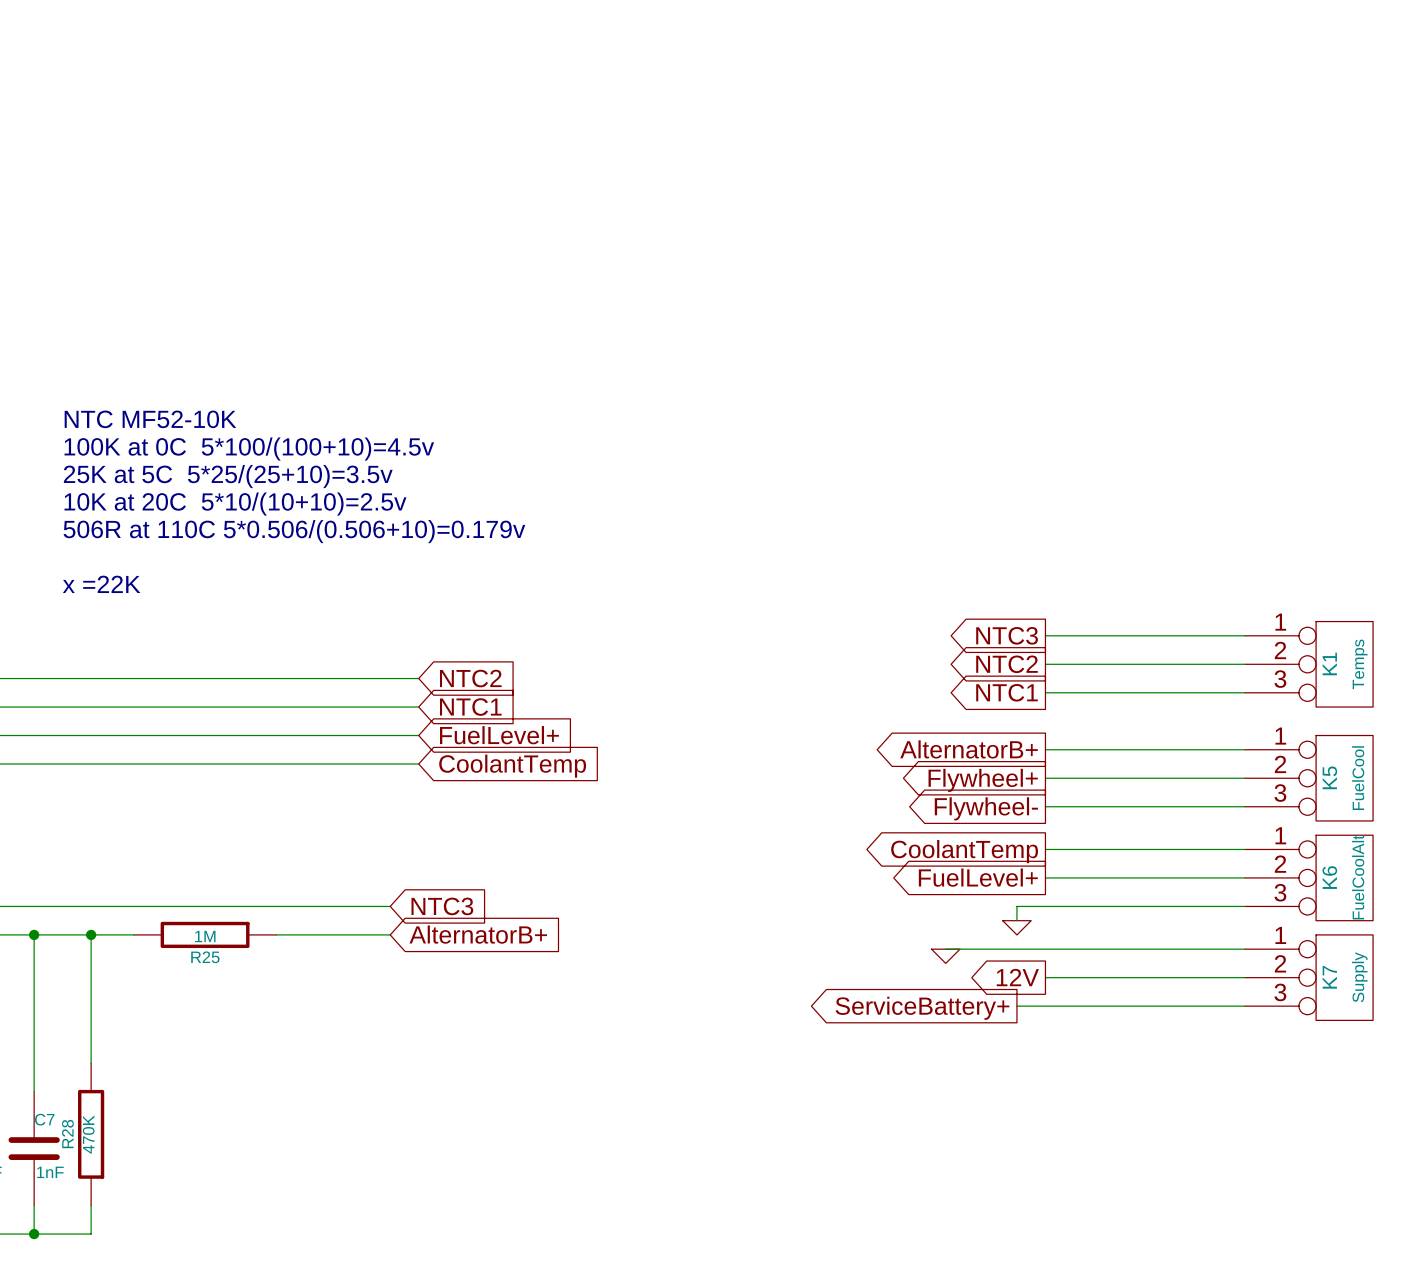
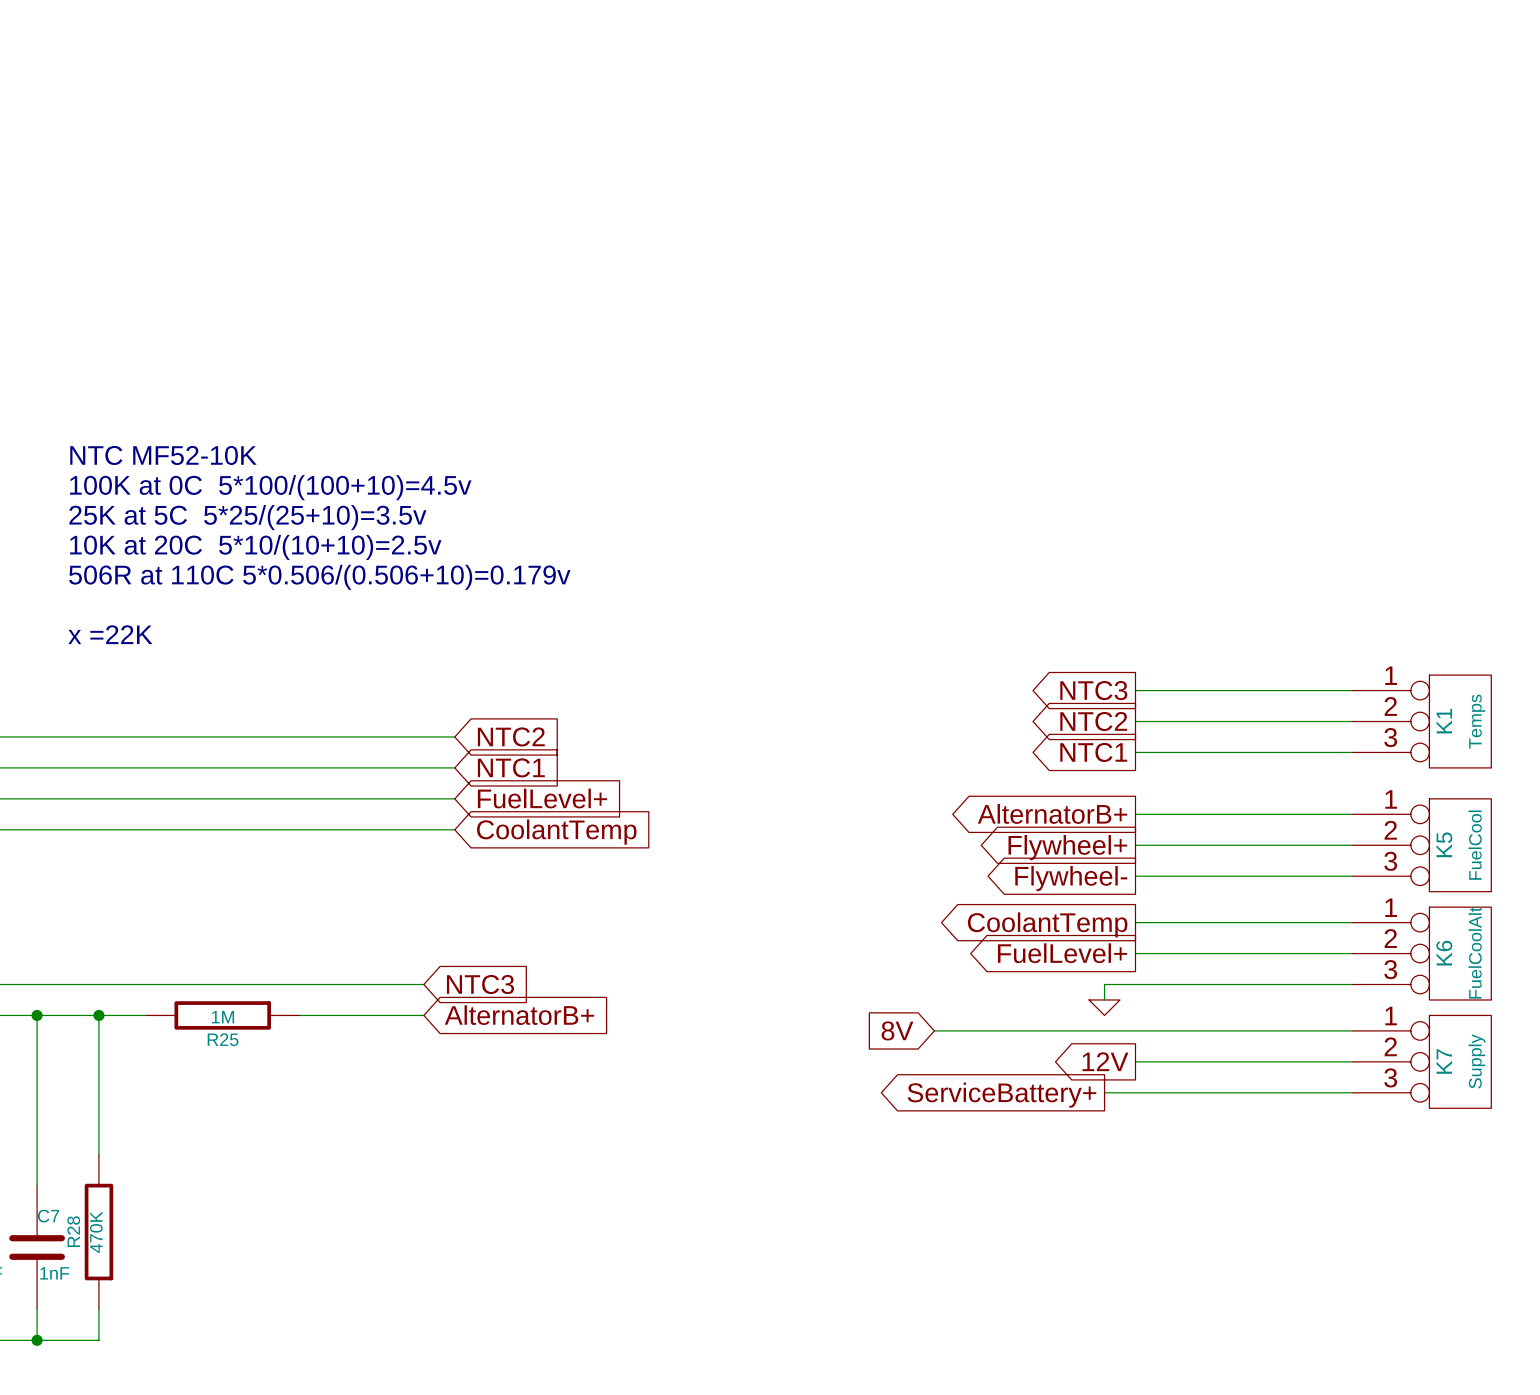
global label: none -> 8V (897, 1030)
wire: none -> (934, 1030) (1027, 1030)
power symbol: (945, 956) -> none

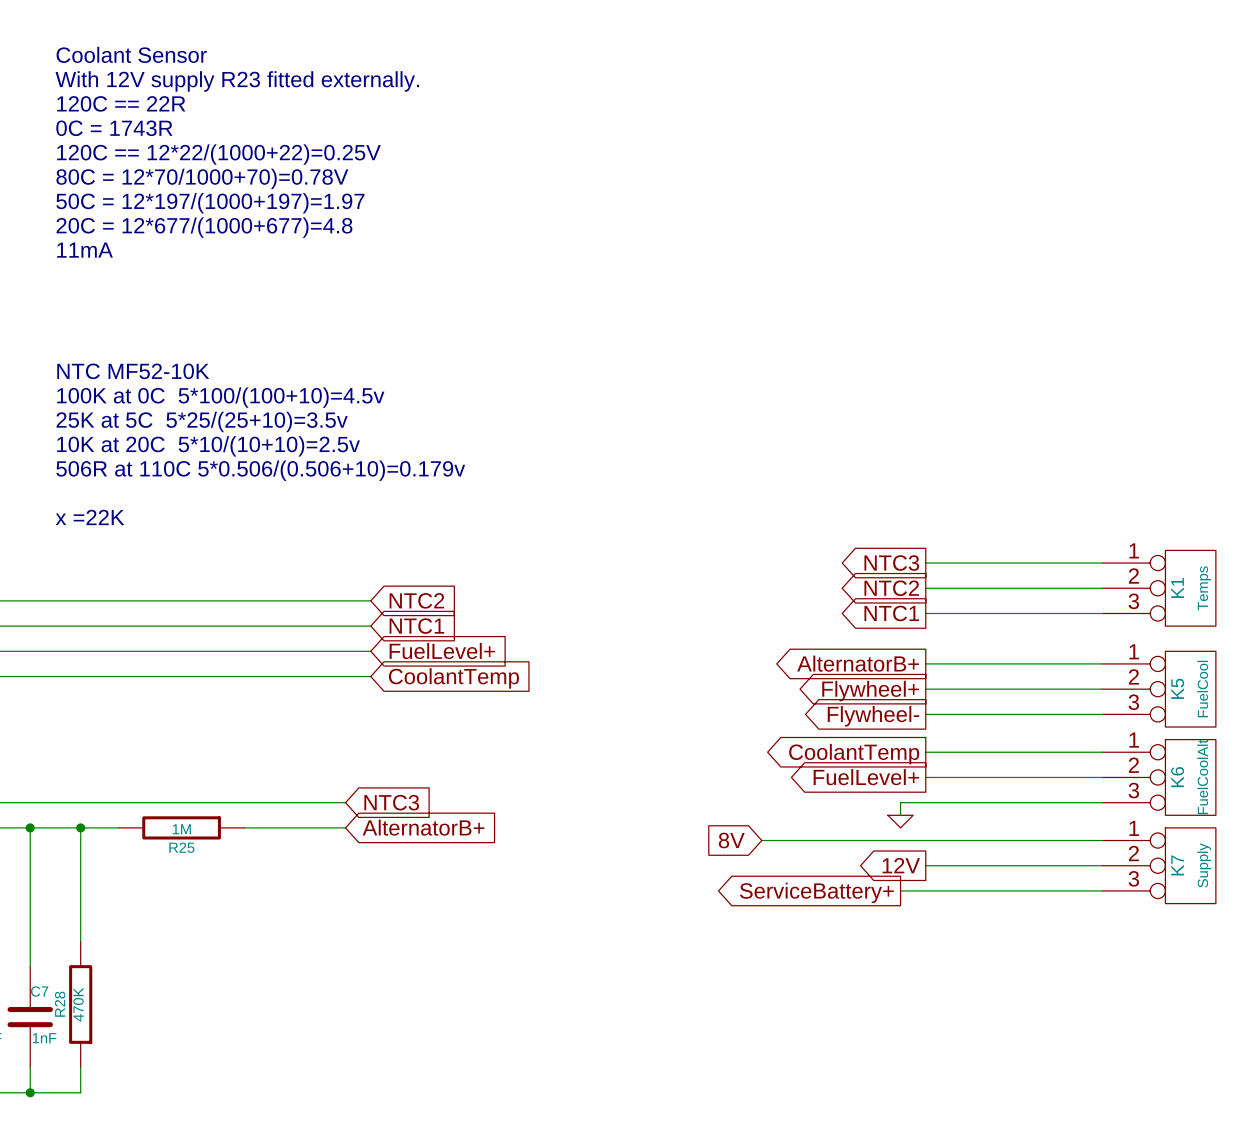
text: none -> Coolant Sensor (131, 54)
text: none -> With 12V supply R23 fitted externally. (237, 81)
text: none -> 120C == 22R (121, 103)
text: none -> 0C = 1743R (114, 128)
text: none -> 120C == 12*22/(1000+22)=0.25V (218, 154)
text: none -> 80C = 12*70/1000+70)=0.78V (202, 178)
text: none -> 50C = 12*197/(1000+197)=1.97 (210, 203)
text: none -> 20C = 12*677/(1000+677)=4.8 (204, 227)
text: none -> 11mA (85, 250)

